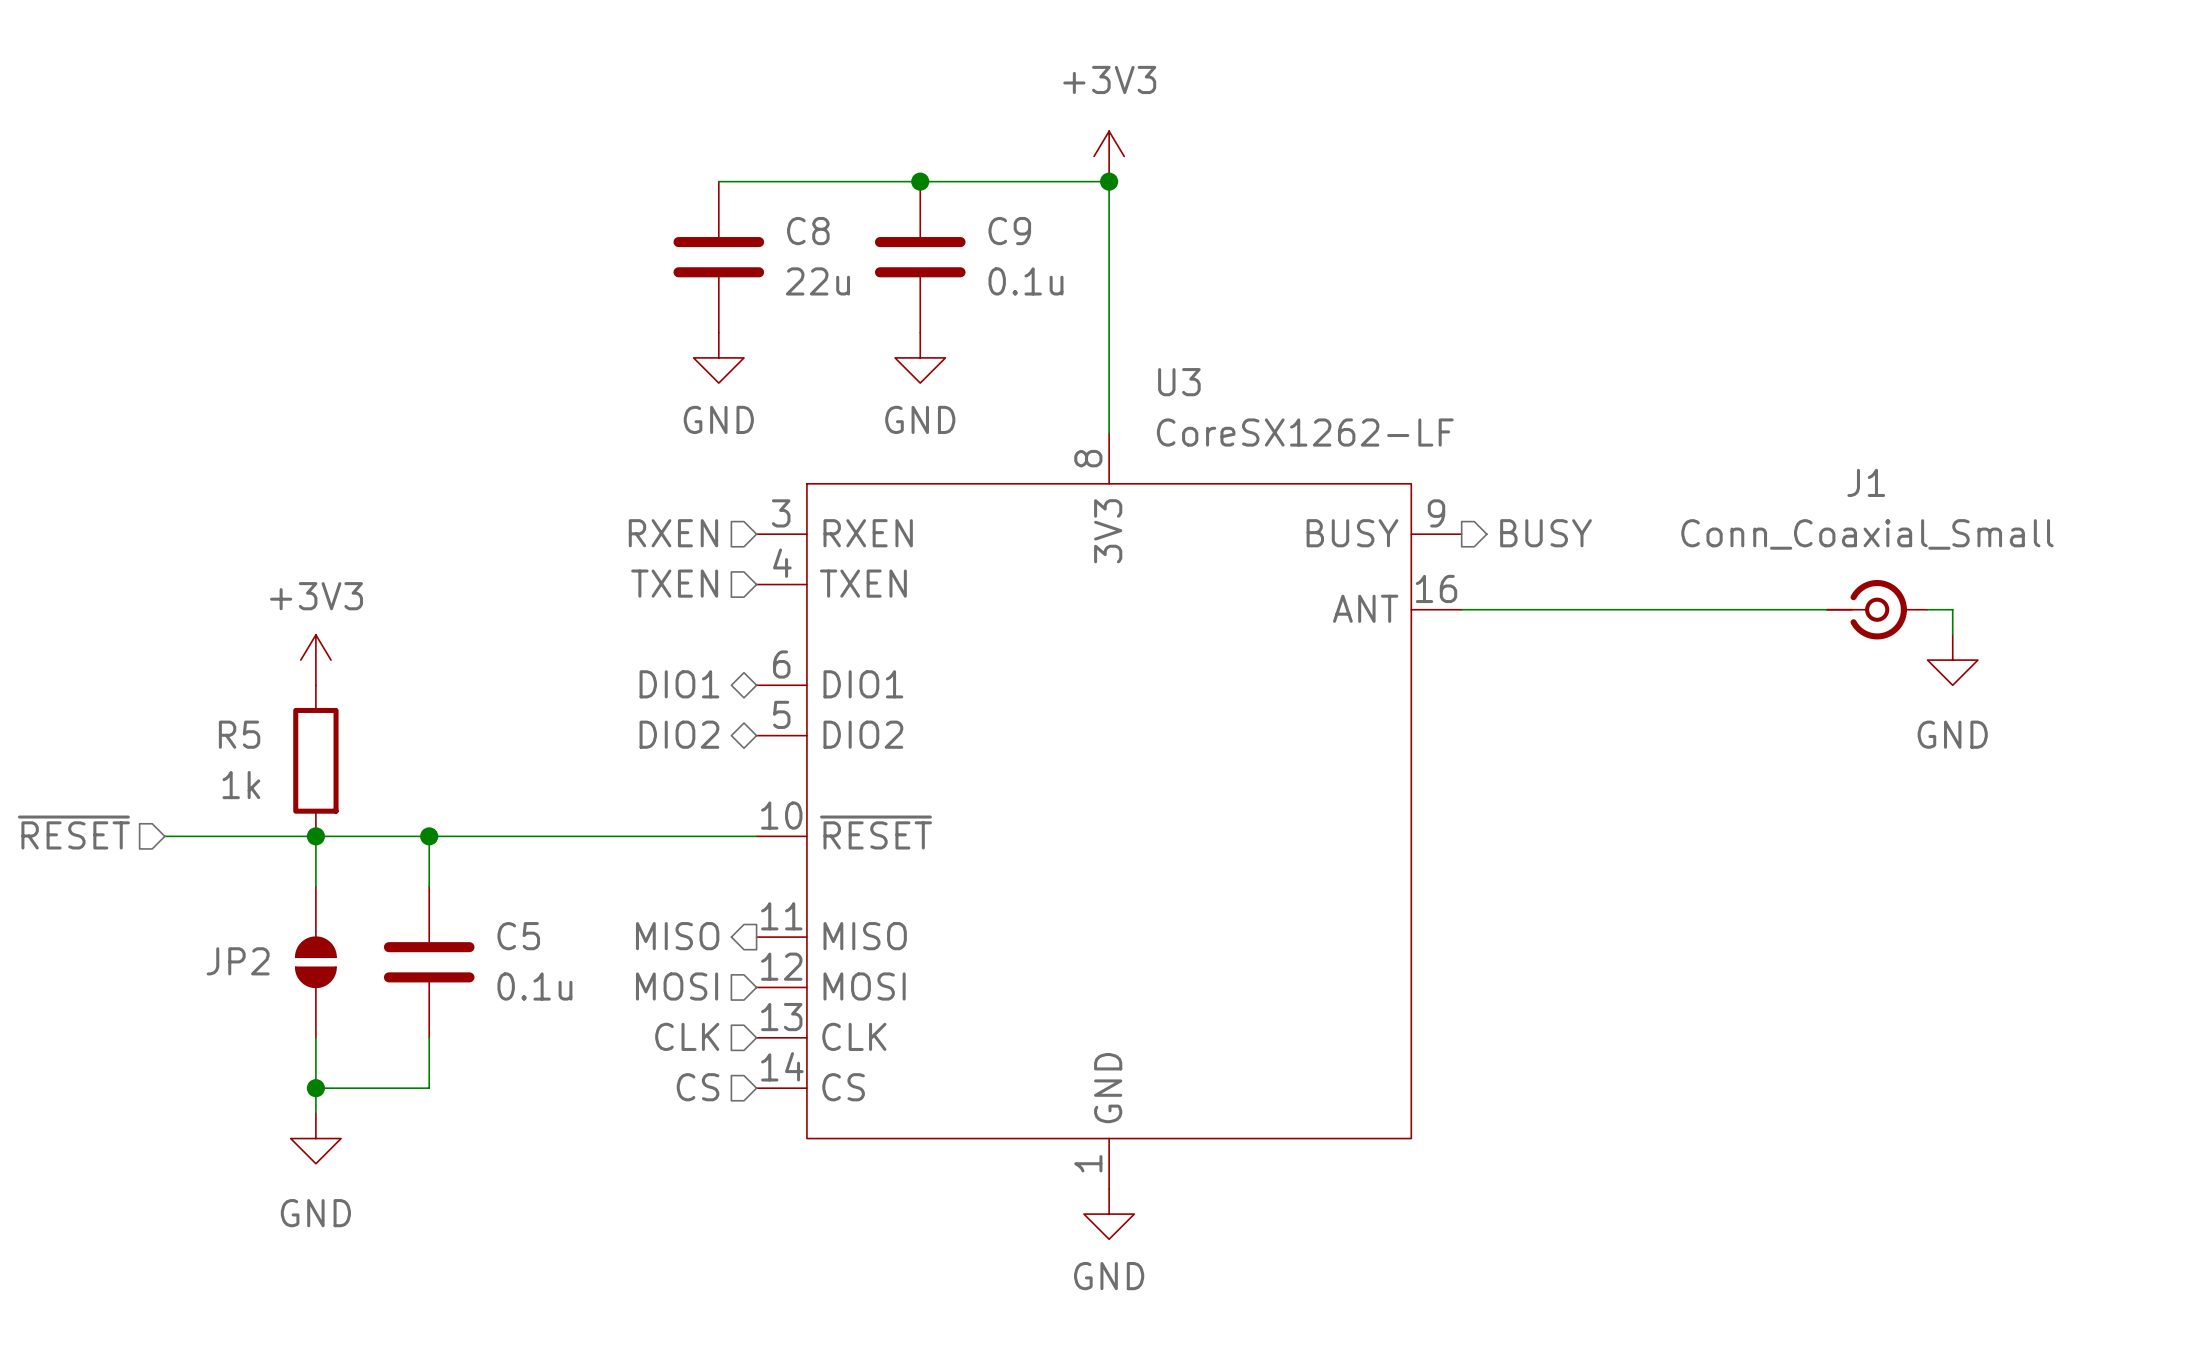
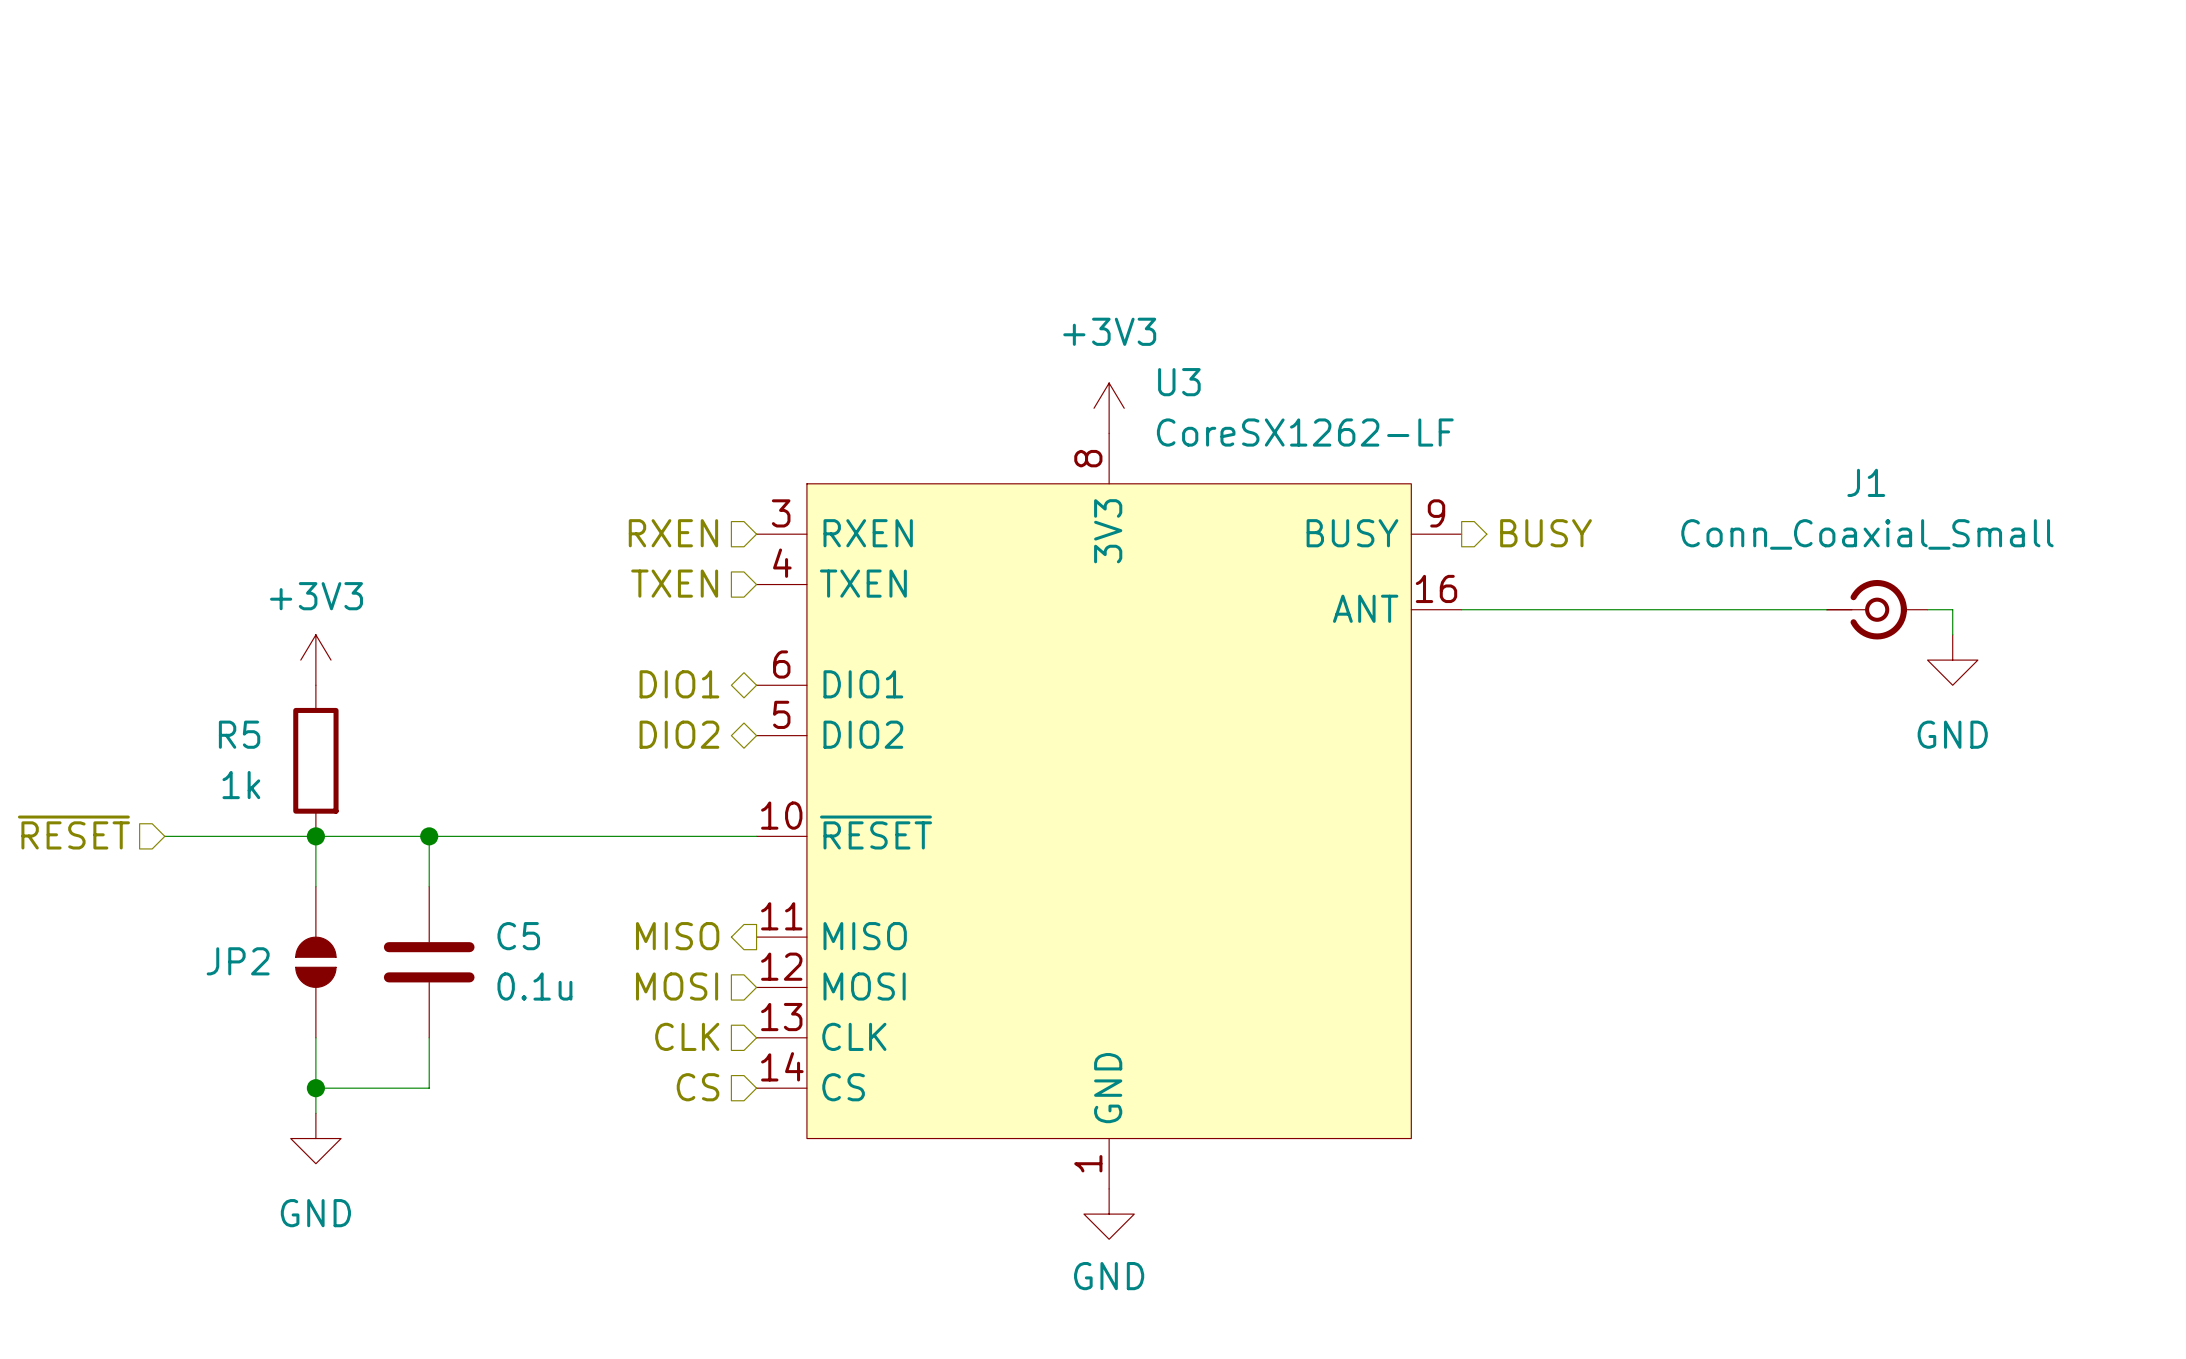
power symbol position: +3V3 (1109, 156) -> +3V3 (1109, 408)
wire: (718, 181) (1109, 181) (1109, 433) -> none
junction: (920, 181) -> none
junction: (1109, 181) -> none
C8: 22u (718, 257) -> none
C9: 0.1u (920, 257) -> none
power symbol: GND (718, 357) -> none
power symbol: GND (920, 357) -> none

